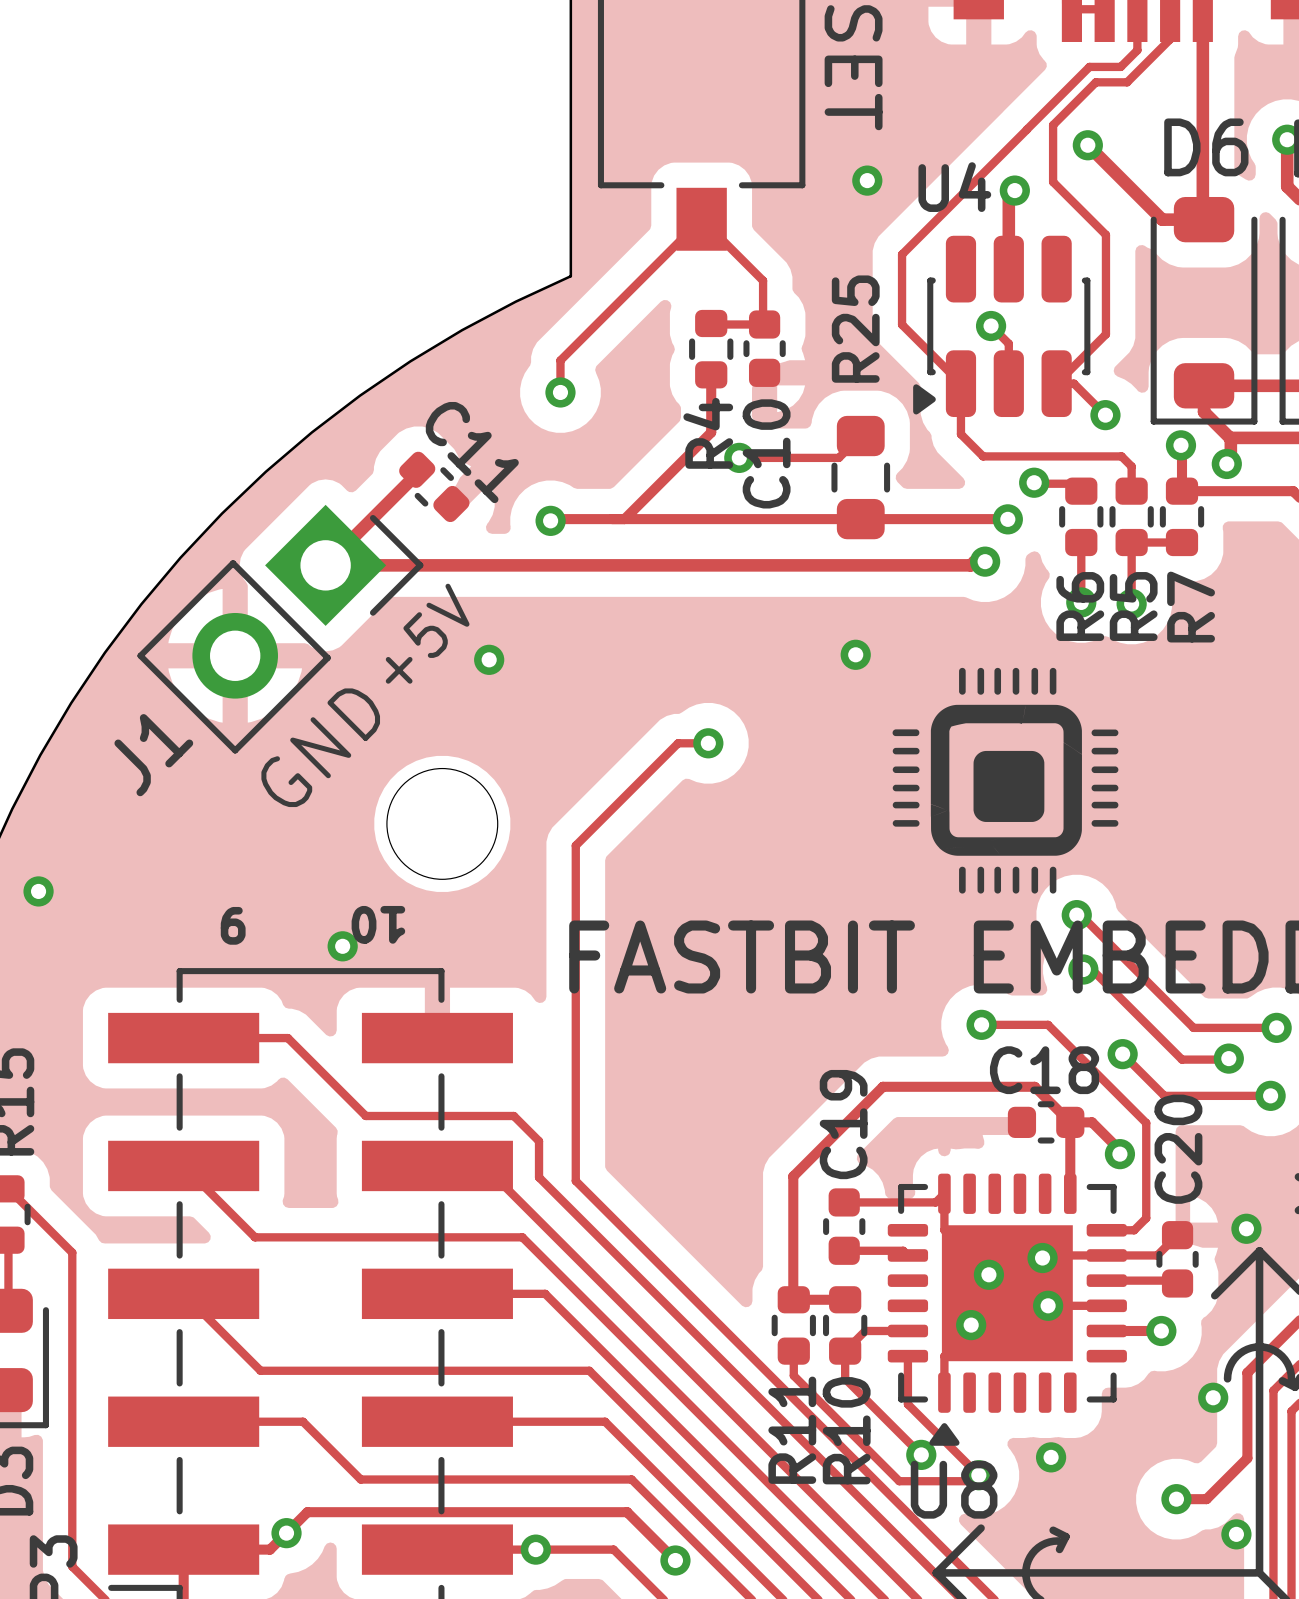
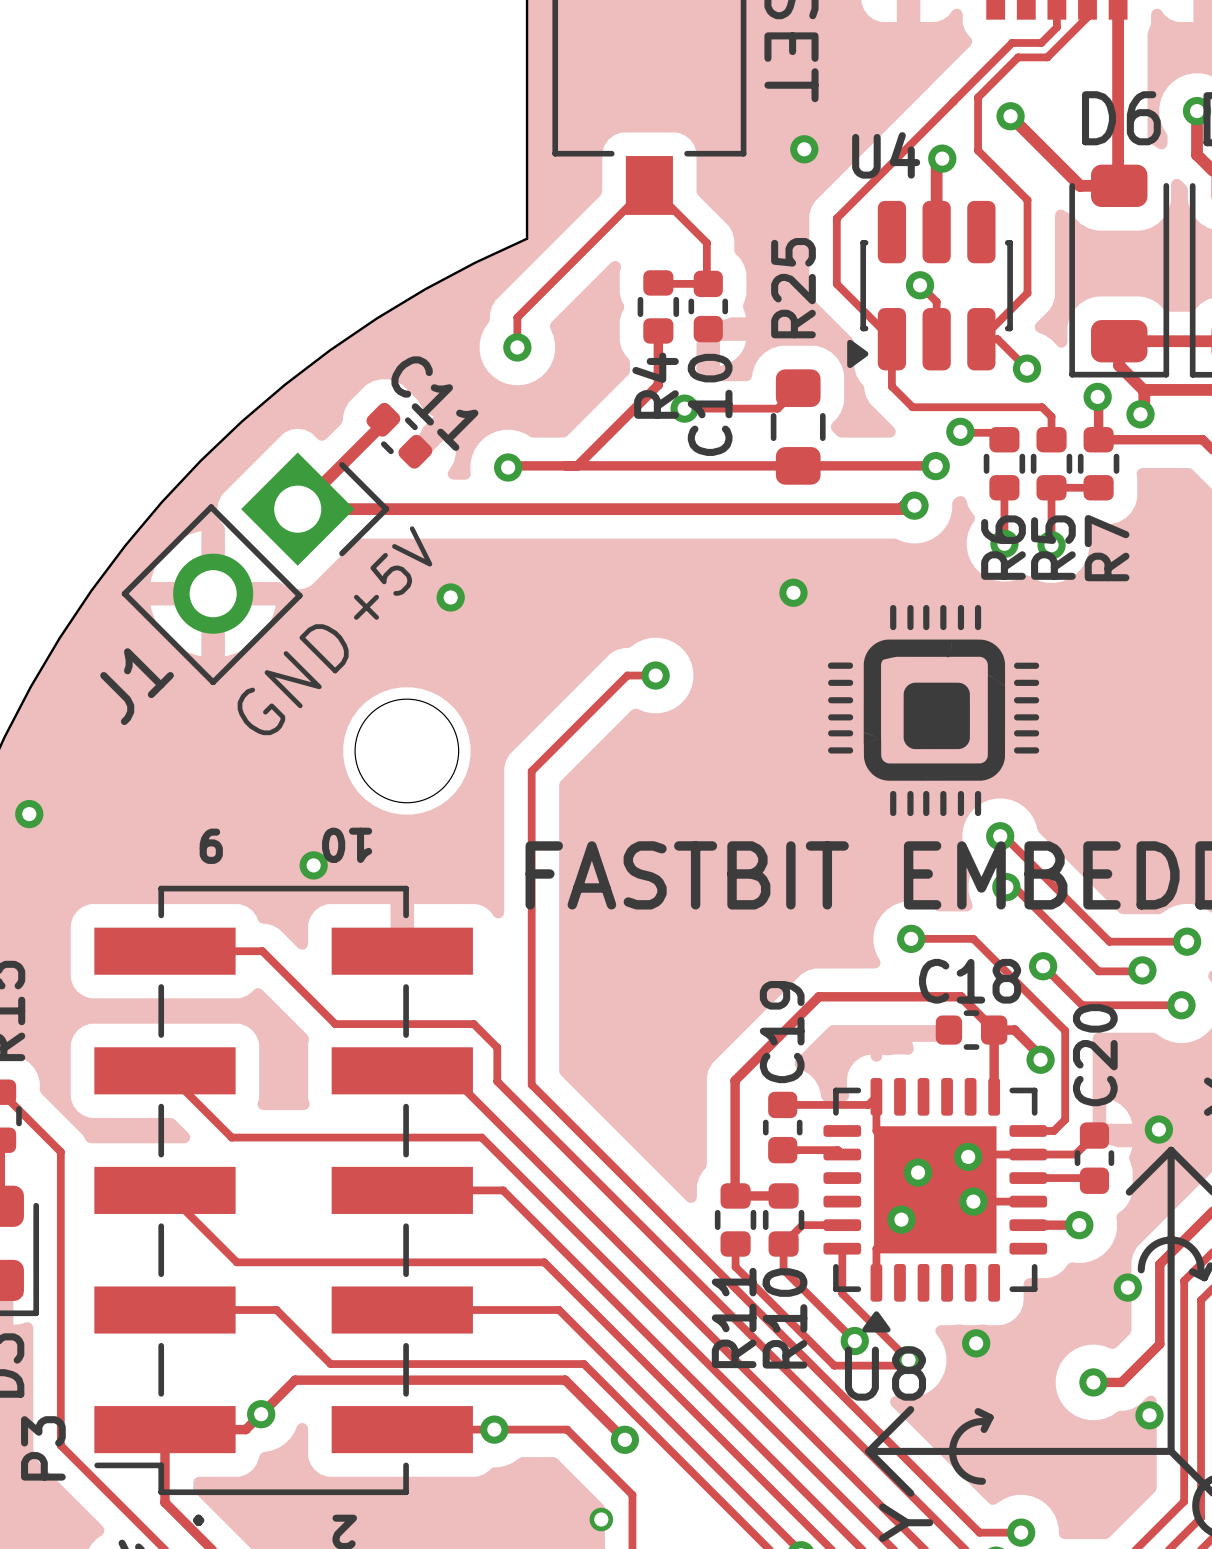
track: (307, 1512) (627, 1512) -> (280, 1394) (295, 1380) (565, 1380) (579, 1394)

